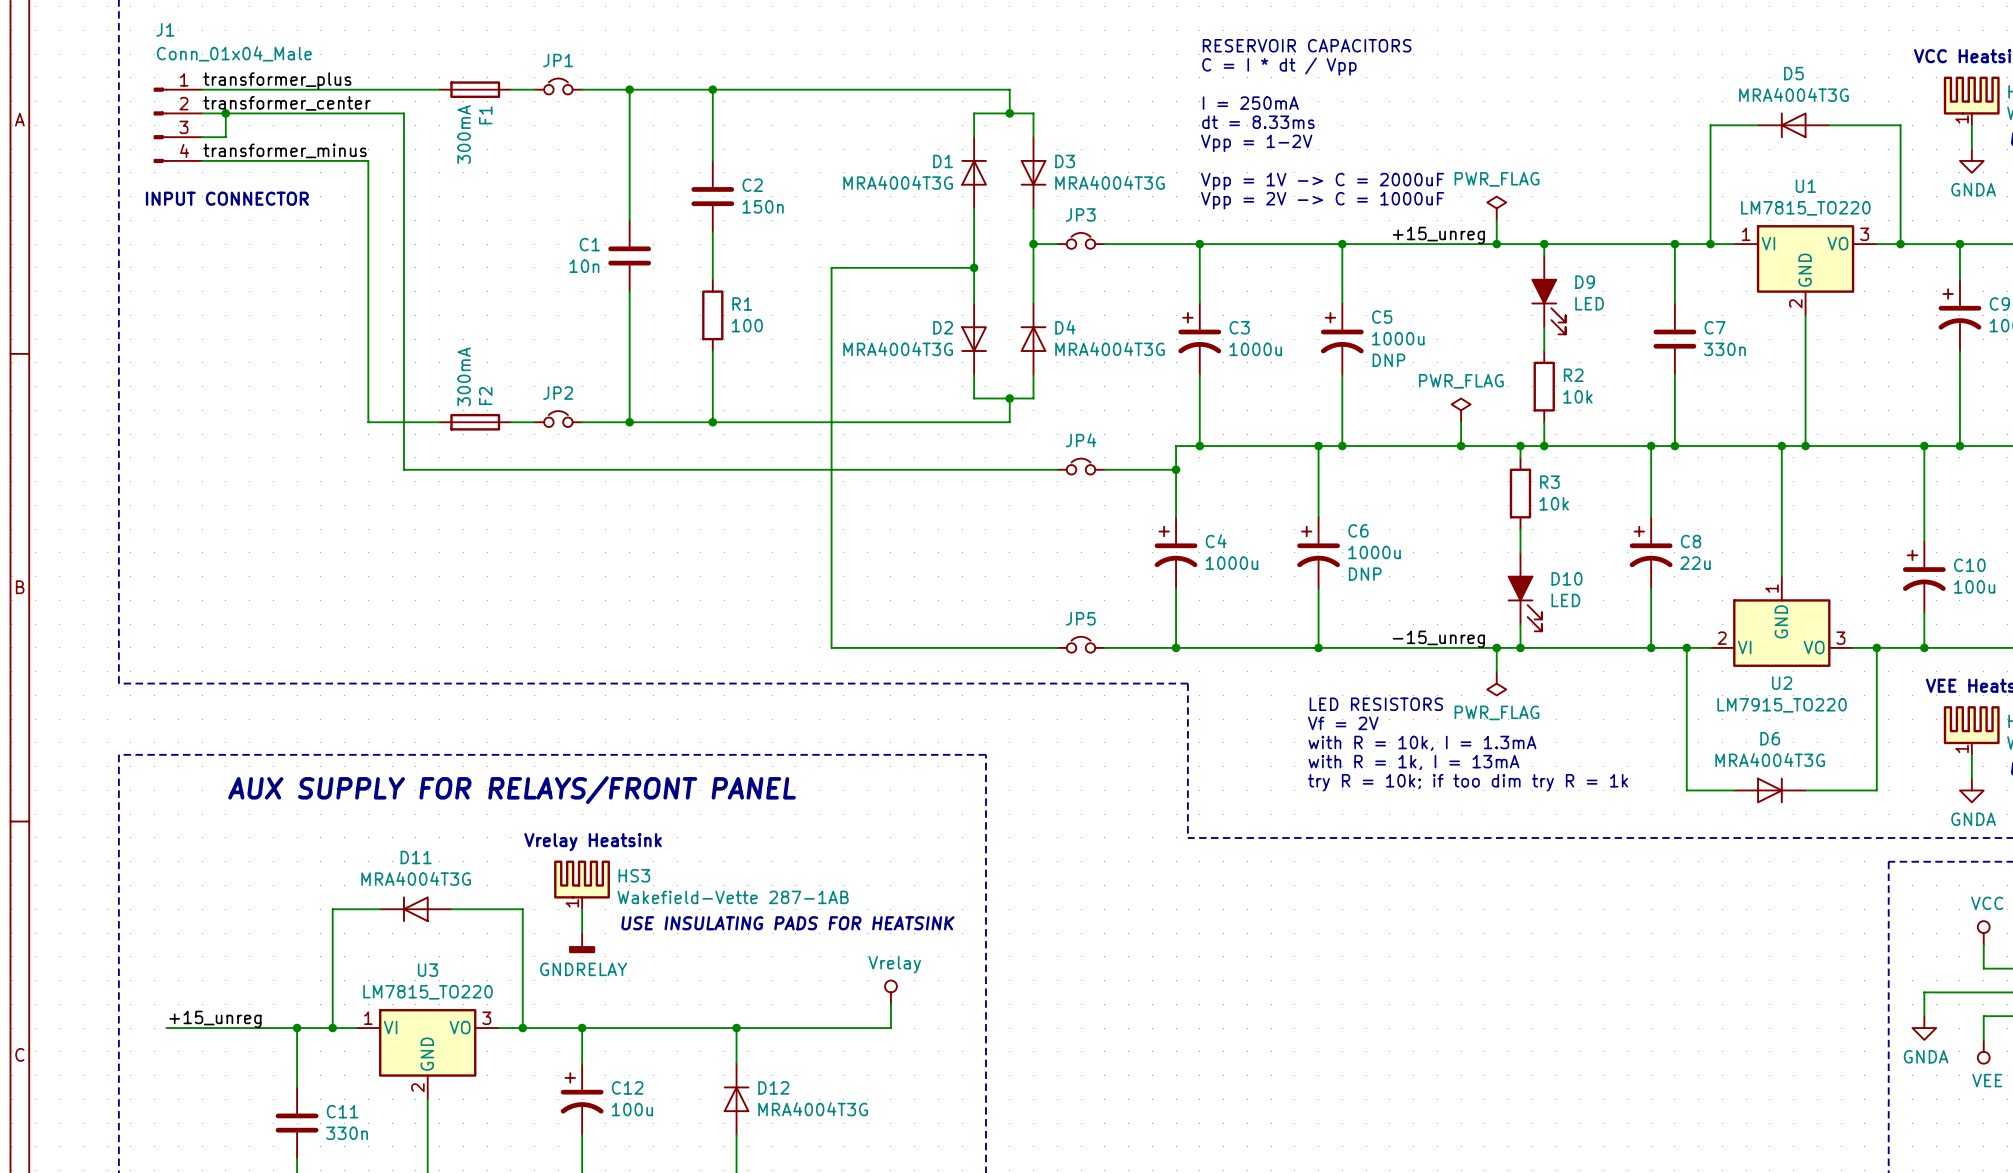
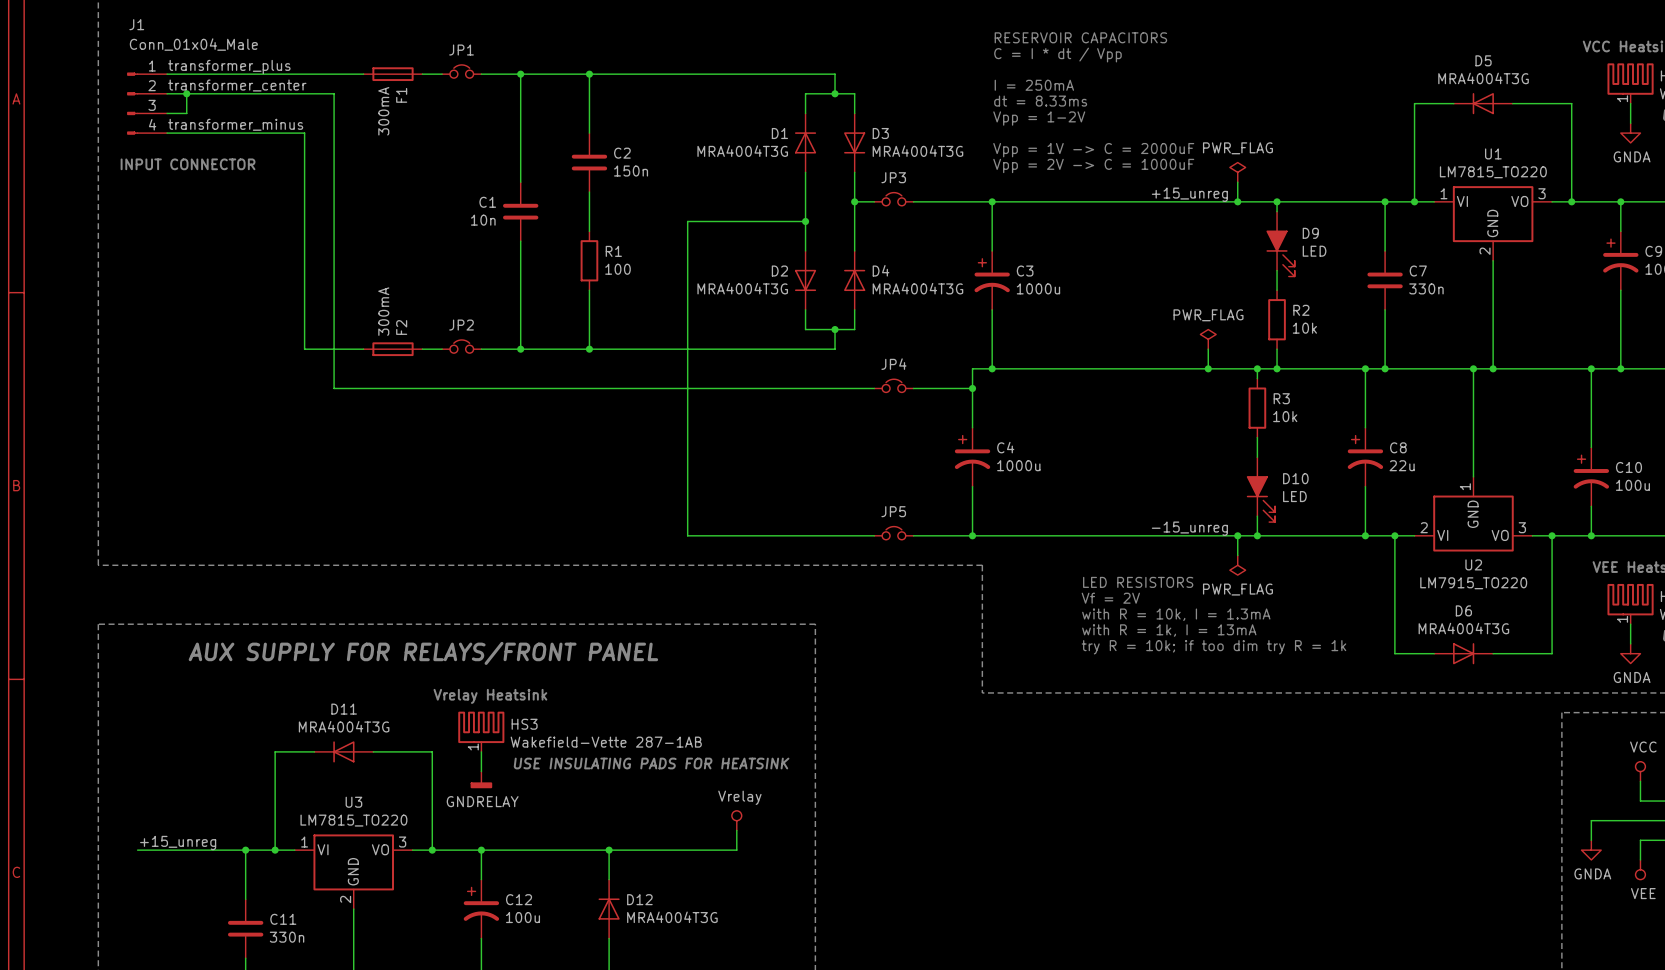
wire: (1342, 244) (1342, 303) -> none
junction: (1342, 244) -> none
C5: 1000u (1342, 339) -> none
wire: (1342, 374) (1342, 446) -> none
wire: (1318, 446) (1318, 517) -> none
junction: (1318, 446) -> none
junction: (1342, 446) -> none
C6: 1000u (1318, 552) -> none
wire: (1318, 588) (1318, 647) -> none
junction: (1318, 647) -> none

